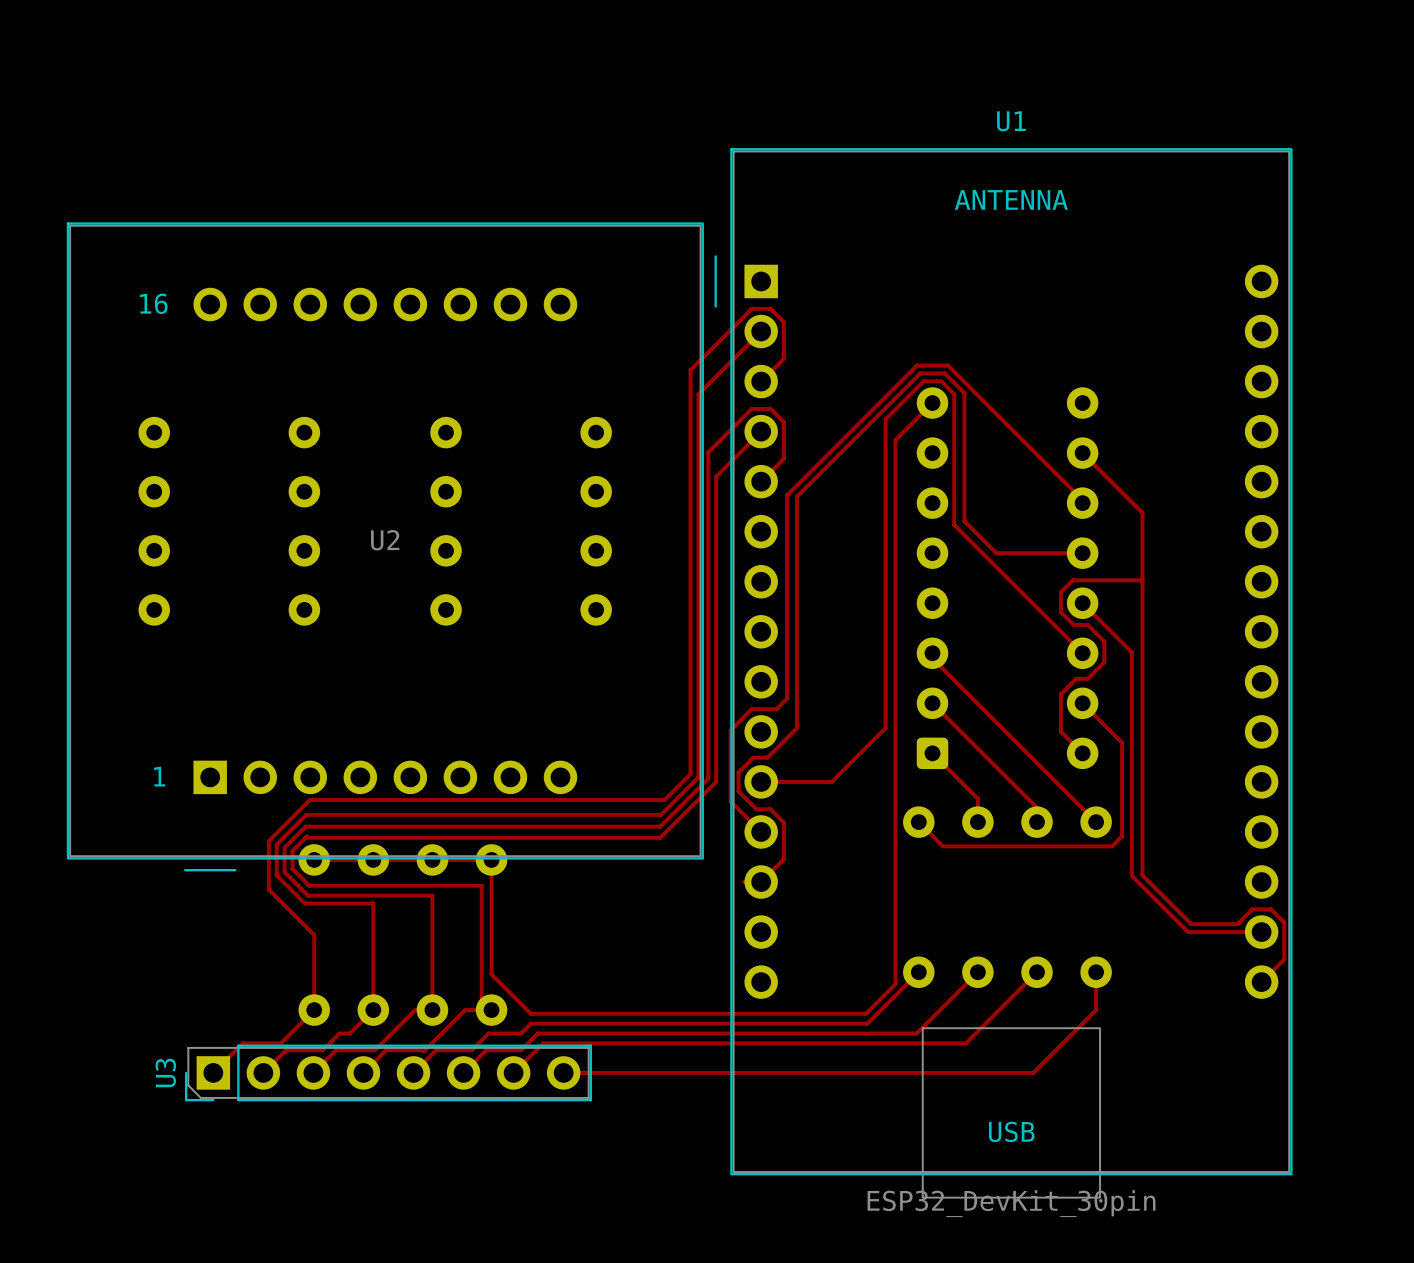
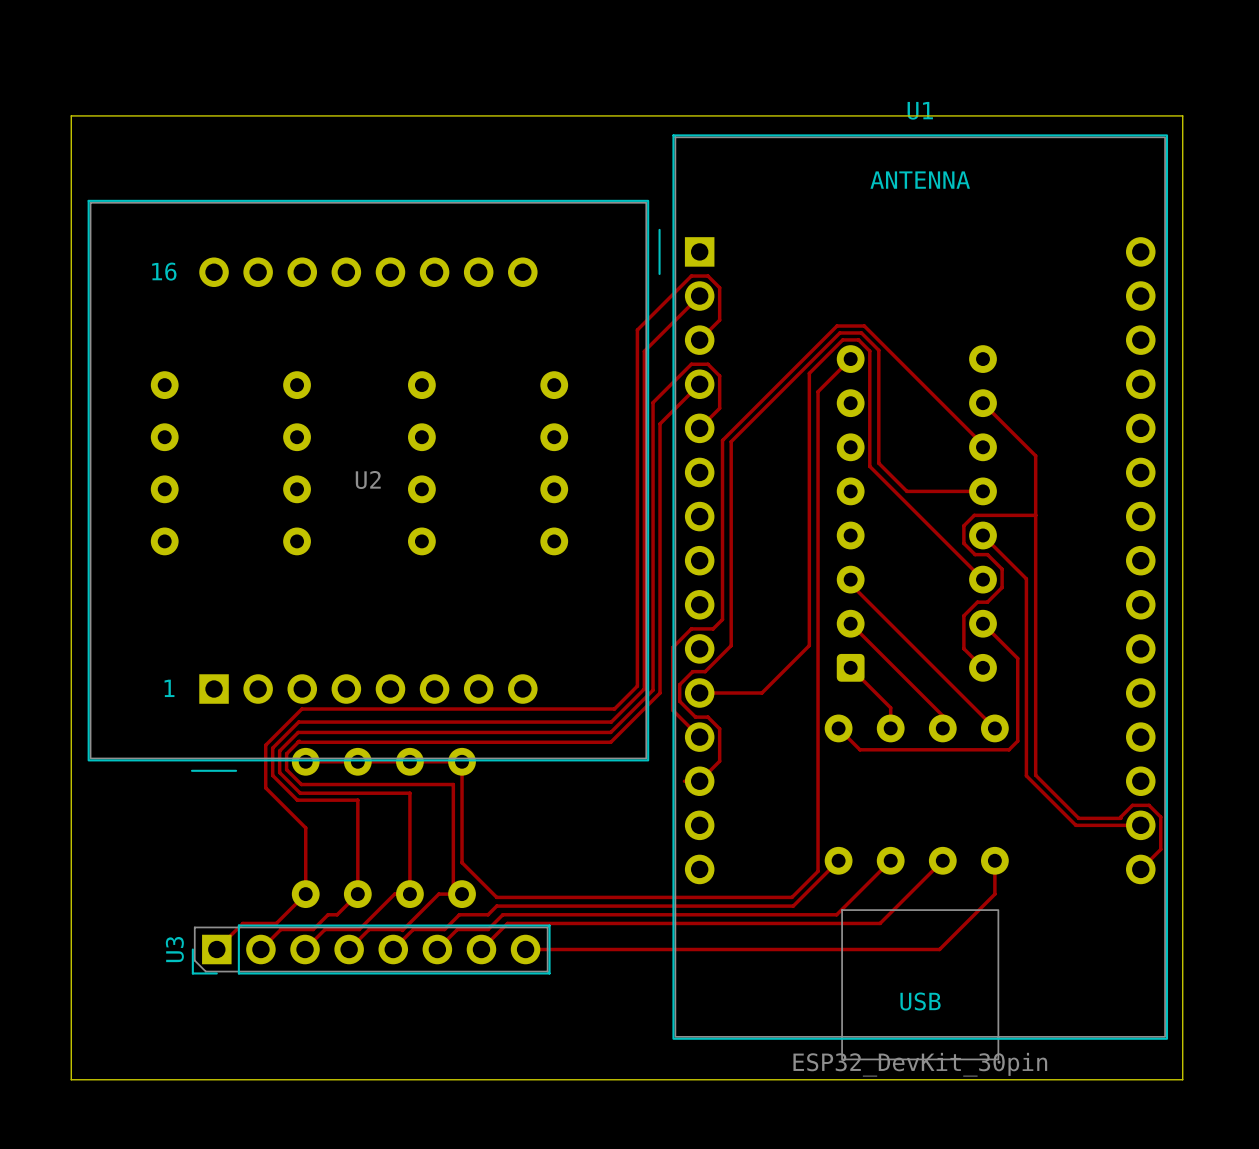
board edge: none -> (71, 115) (1182, 115) (1182, 1079) (71, 1079) (71, 115)

